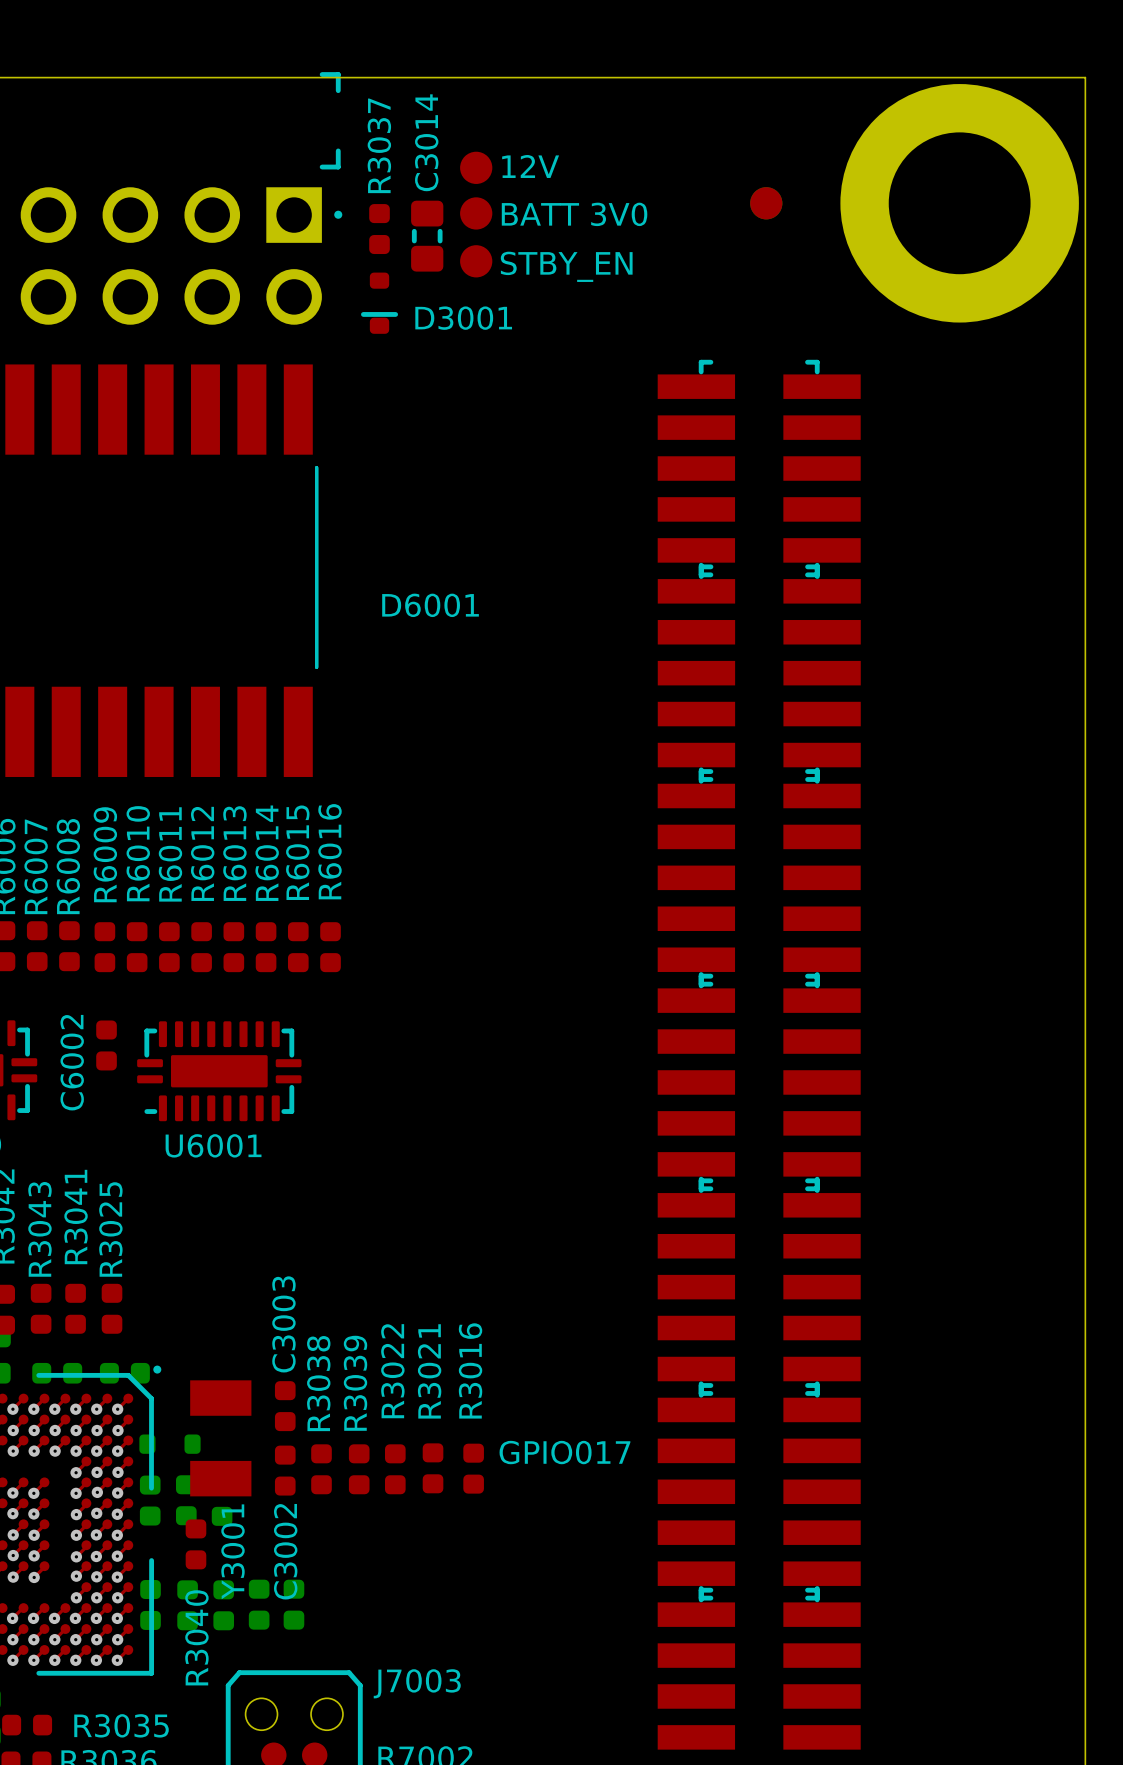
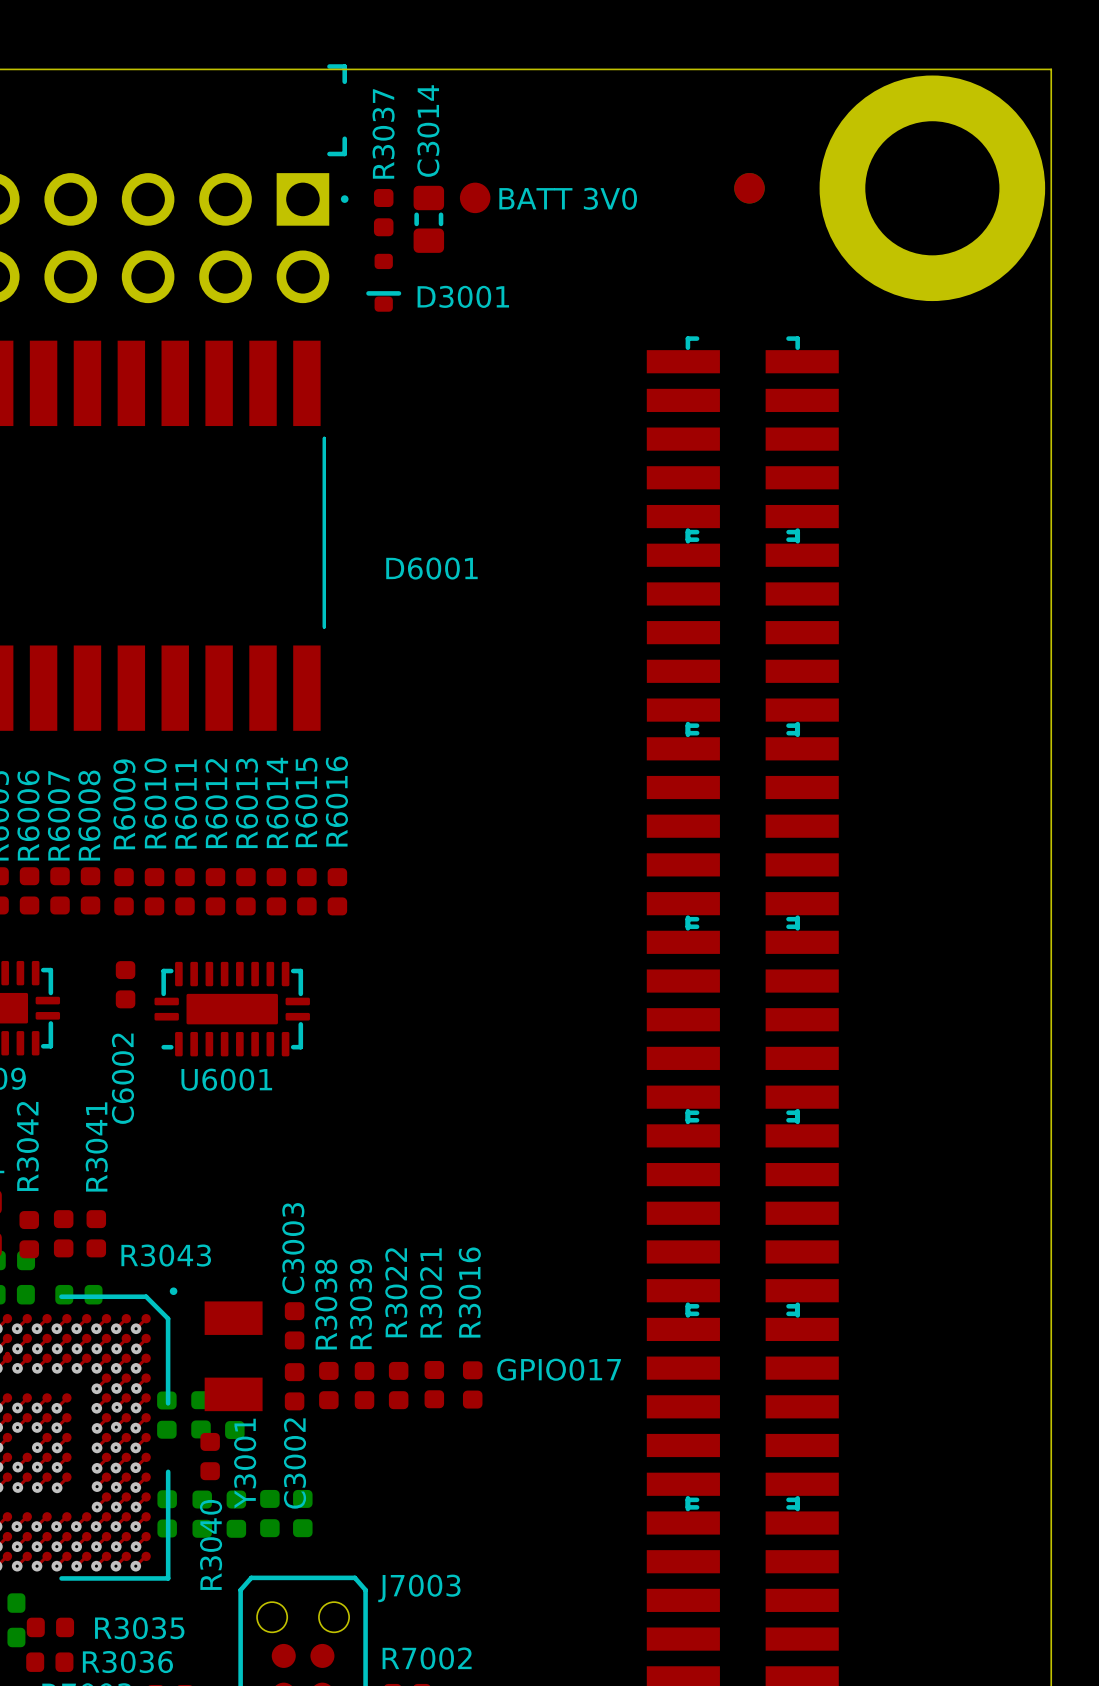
text: 12V (530, 166) -> none
part: (476, 167) -> none
part: (476, 261) -> none
text: STBY_EN (566, 266) -> none
C6002 name position: C6002 (72, 1062) -> C6002 (122, 1078)
R3043 name rotation: 0° (39, 1229) -> 90° clockwise (166, 1255)
R3043 name position: R3043 (39, 1229) -> R3043 (166, 1255)
R3025: (112, 1308) -> none
part: (124, 1373) -> none
part: (169, 1444) -> none

